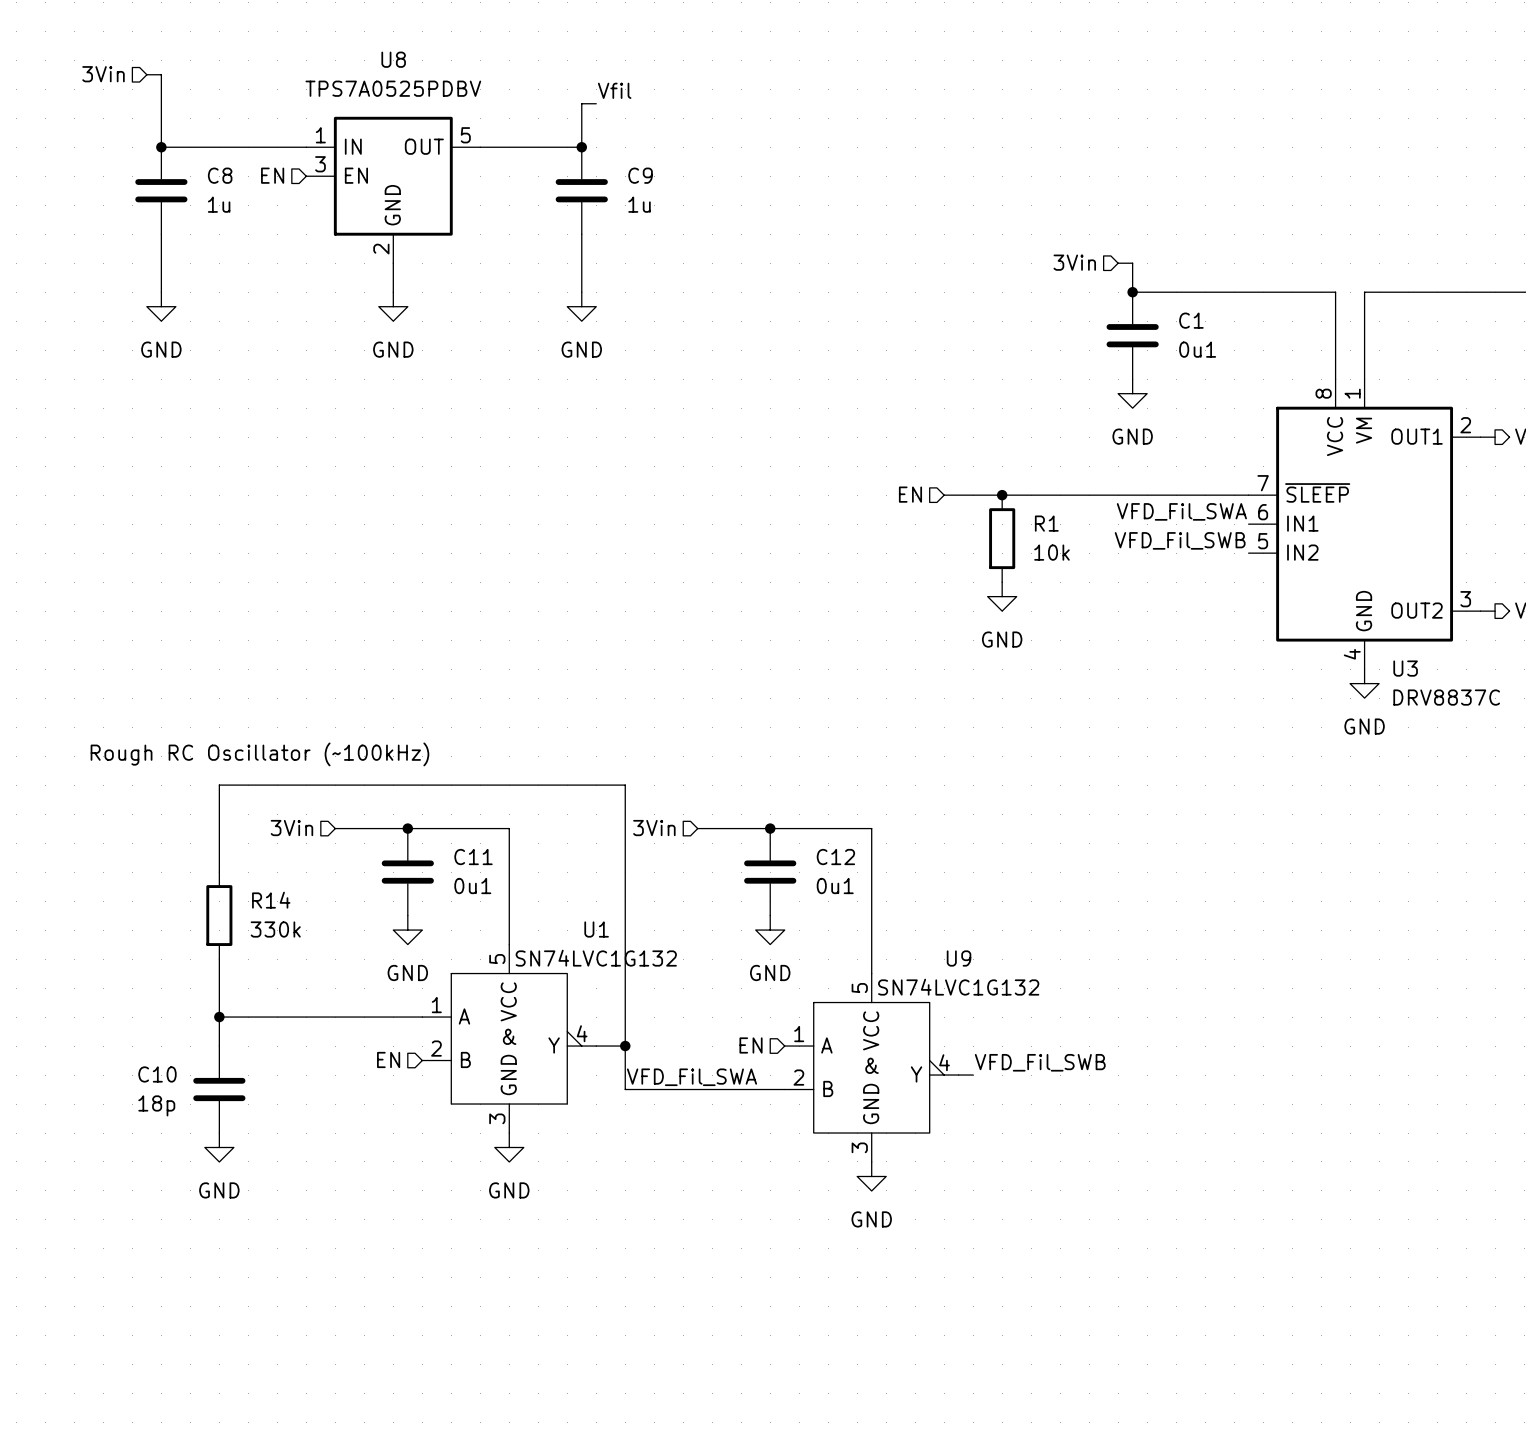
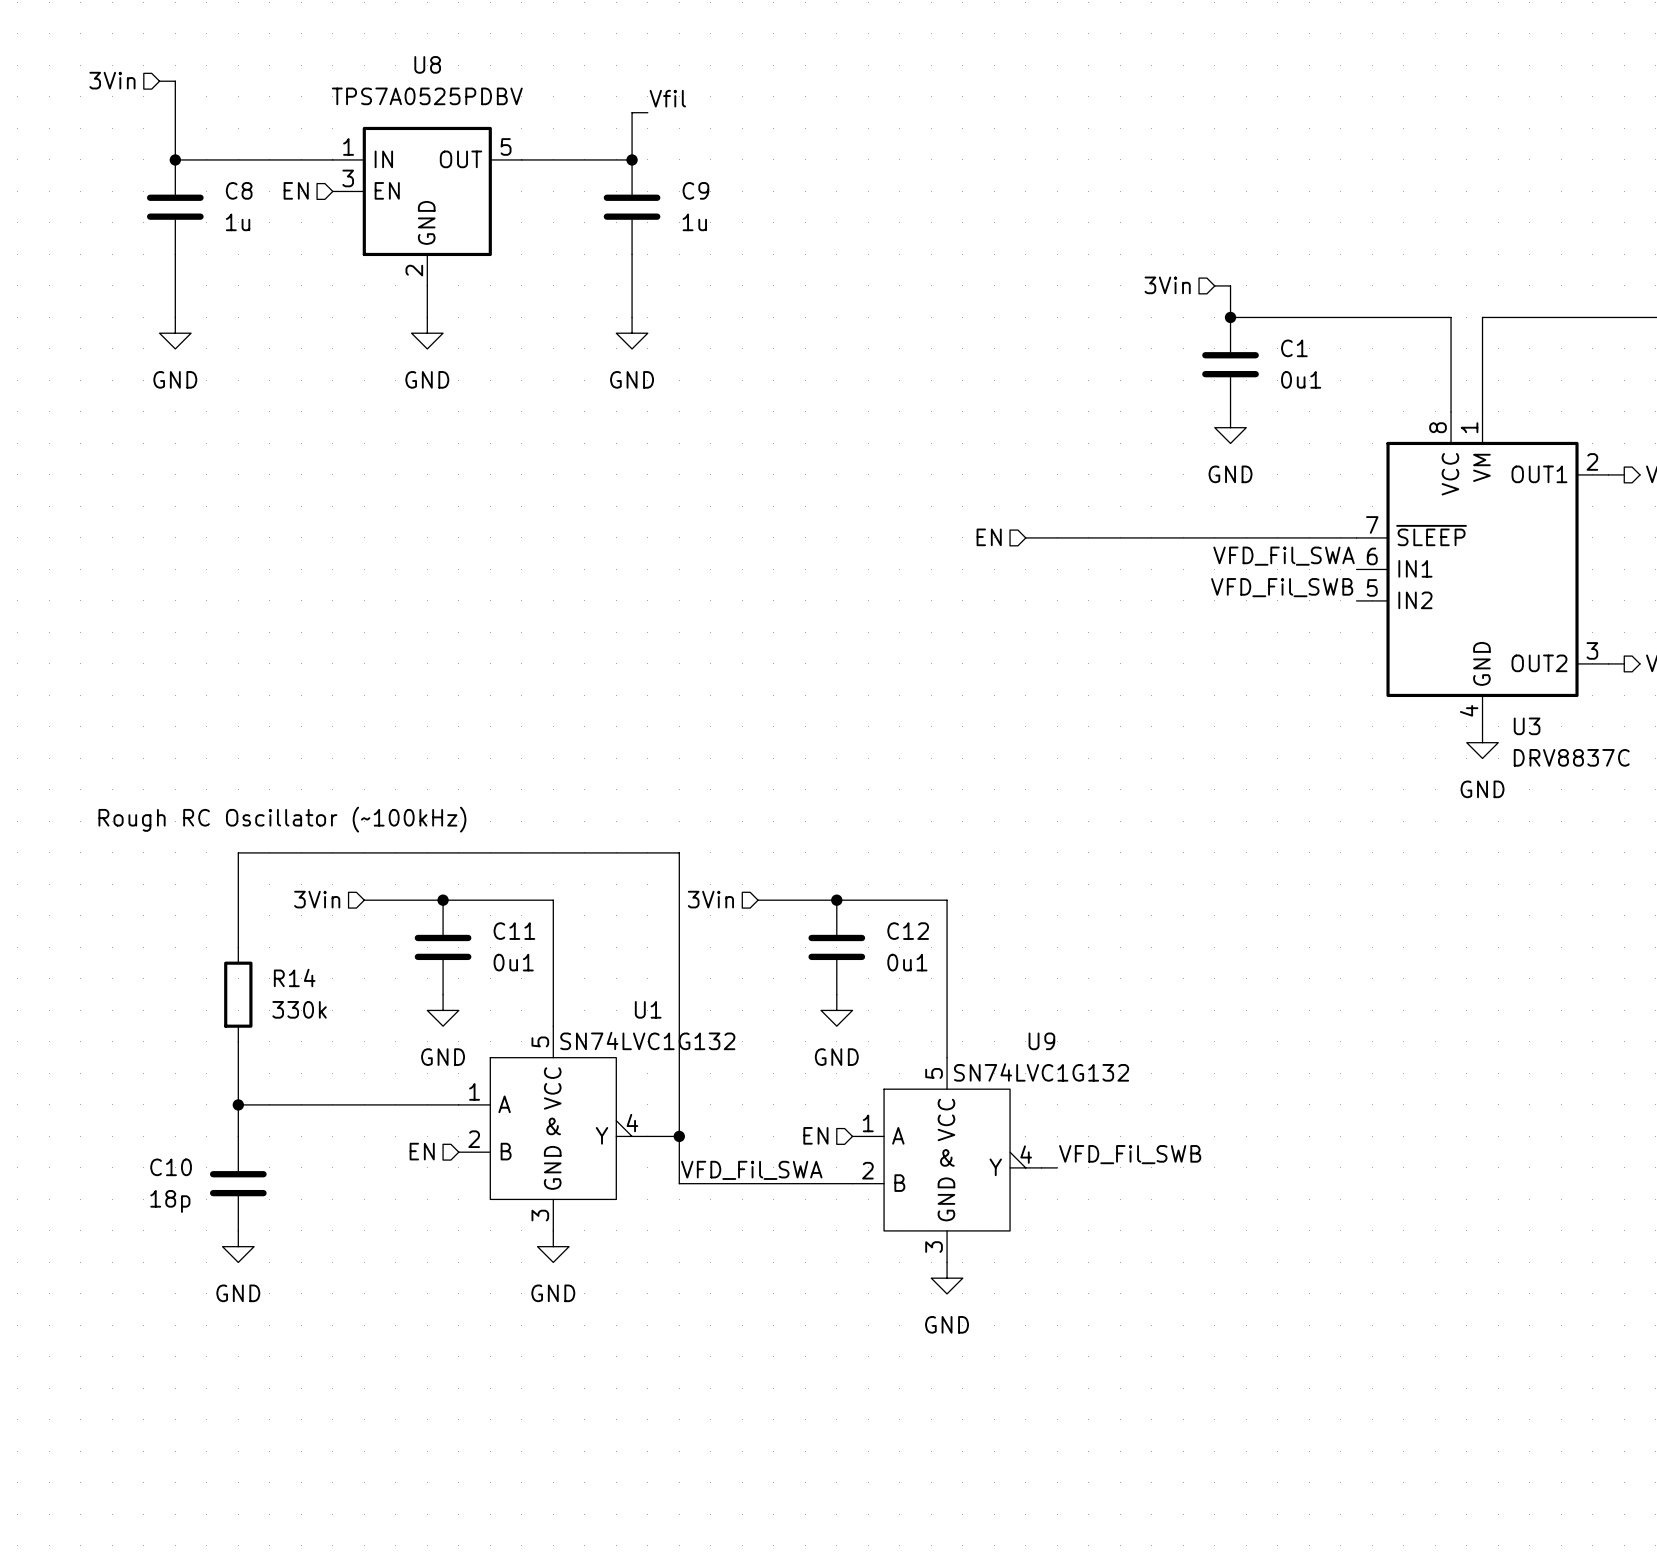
junction: (1002, 495) -> none
R1: 10k (1002, 538) -> none
power symbol: GND (1002, 596) -> none

